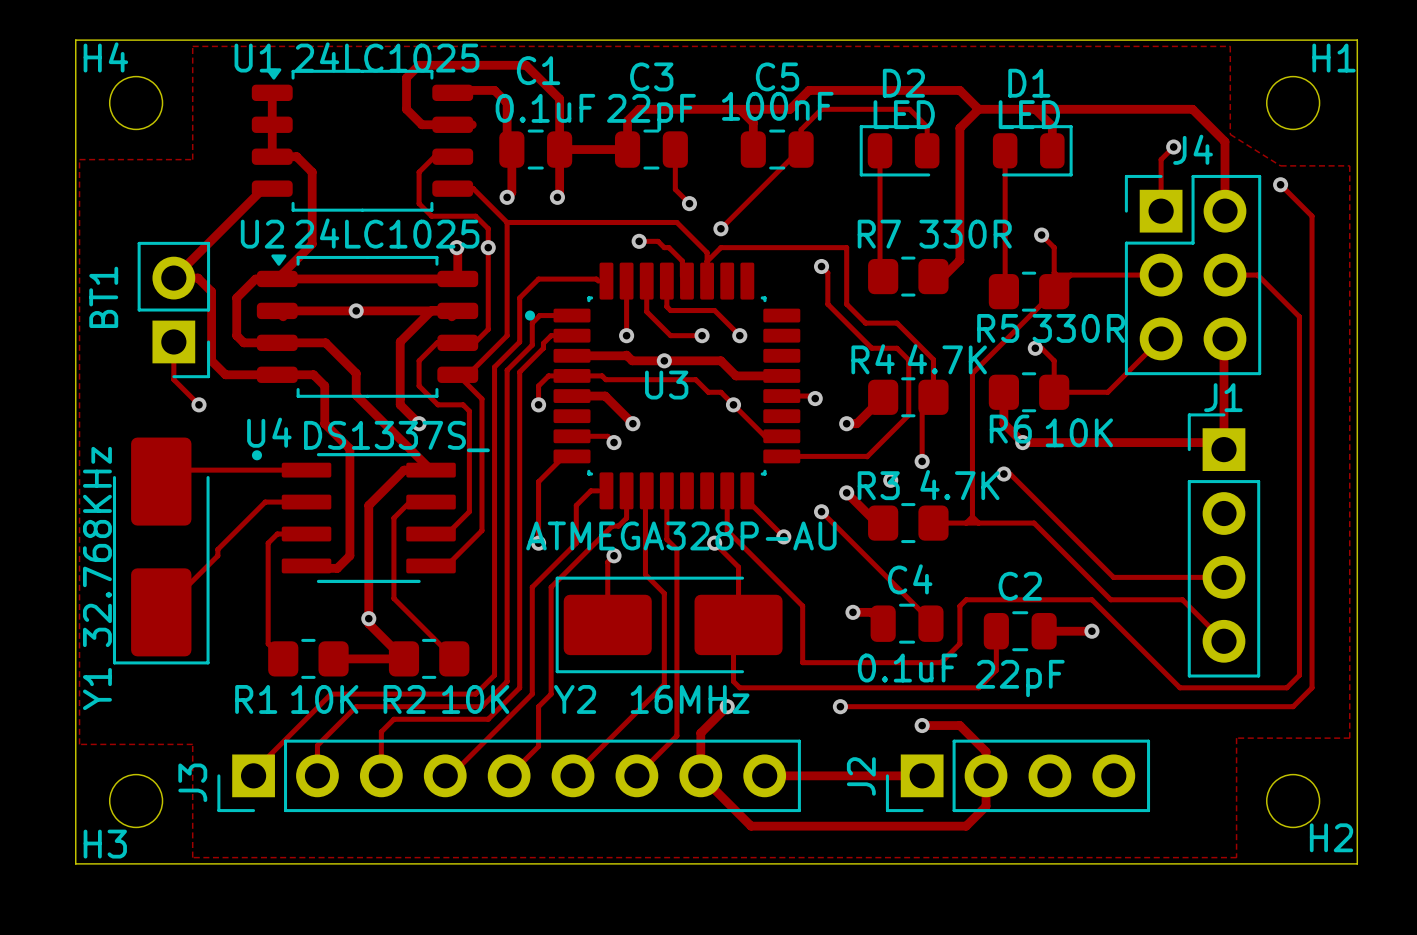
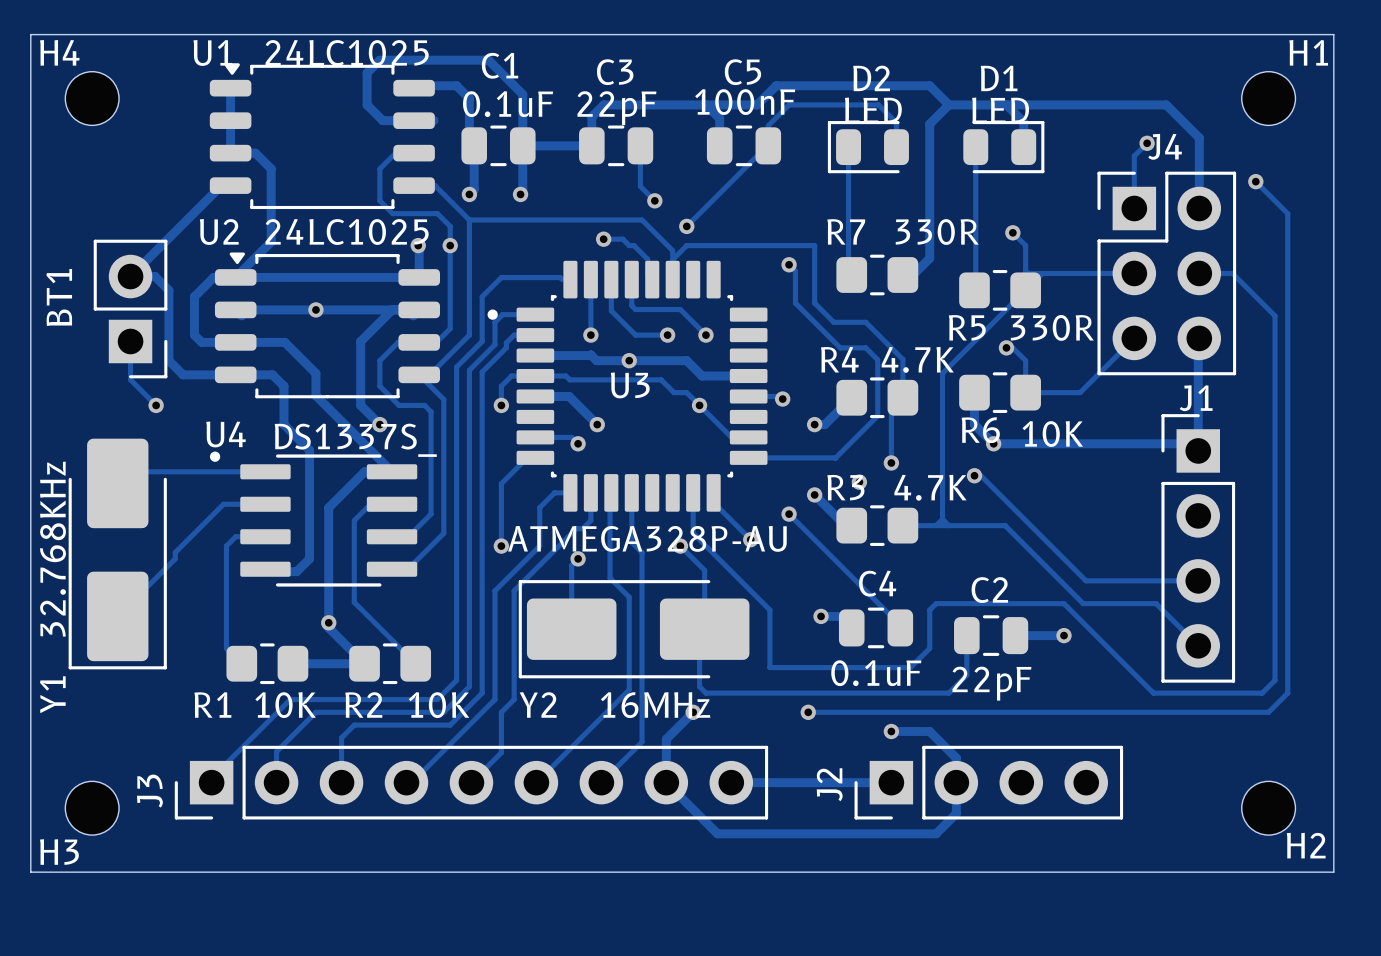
zone outline: (192, 46) (192, 159) (79, 159) (79, 744) (192, 744) (192, 857) (1236, 857) (1236, 738) (1349, 738) (1349, 165) (1280, 165) (1230, 134) (1230, 46) (192, 46) -> none

